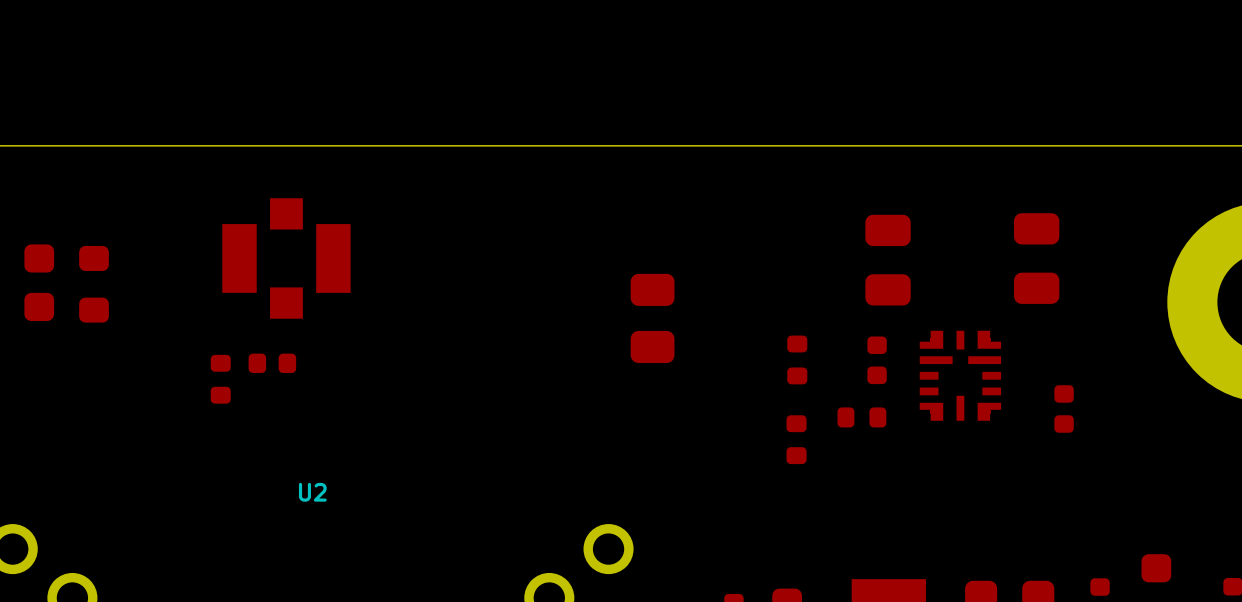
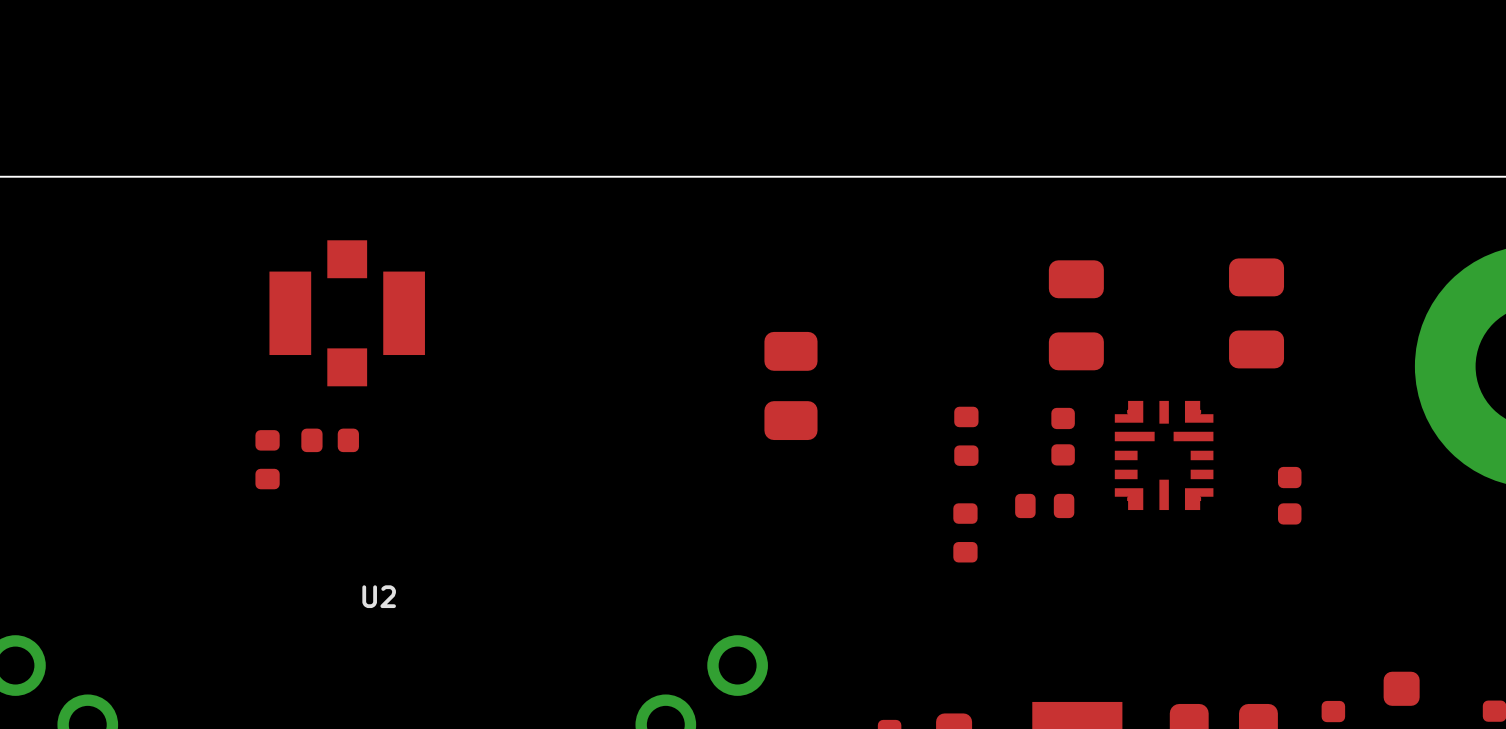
part: (39, 282) -> none
part: (94, 284) -> none

